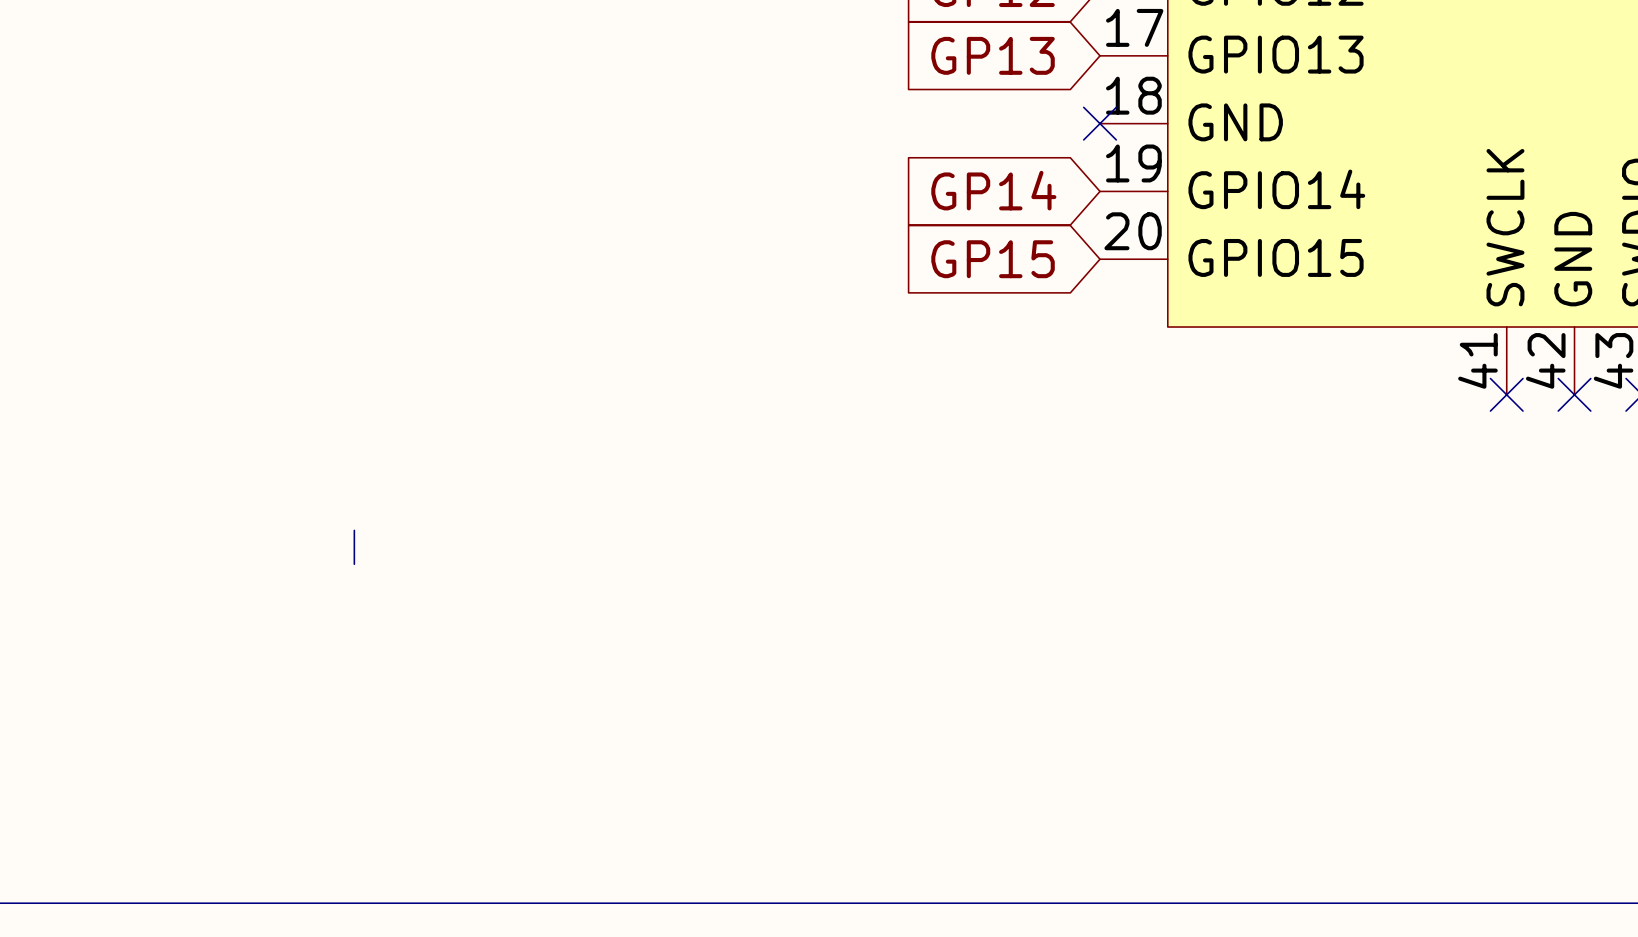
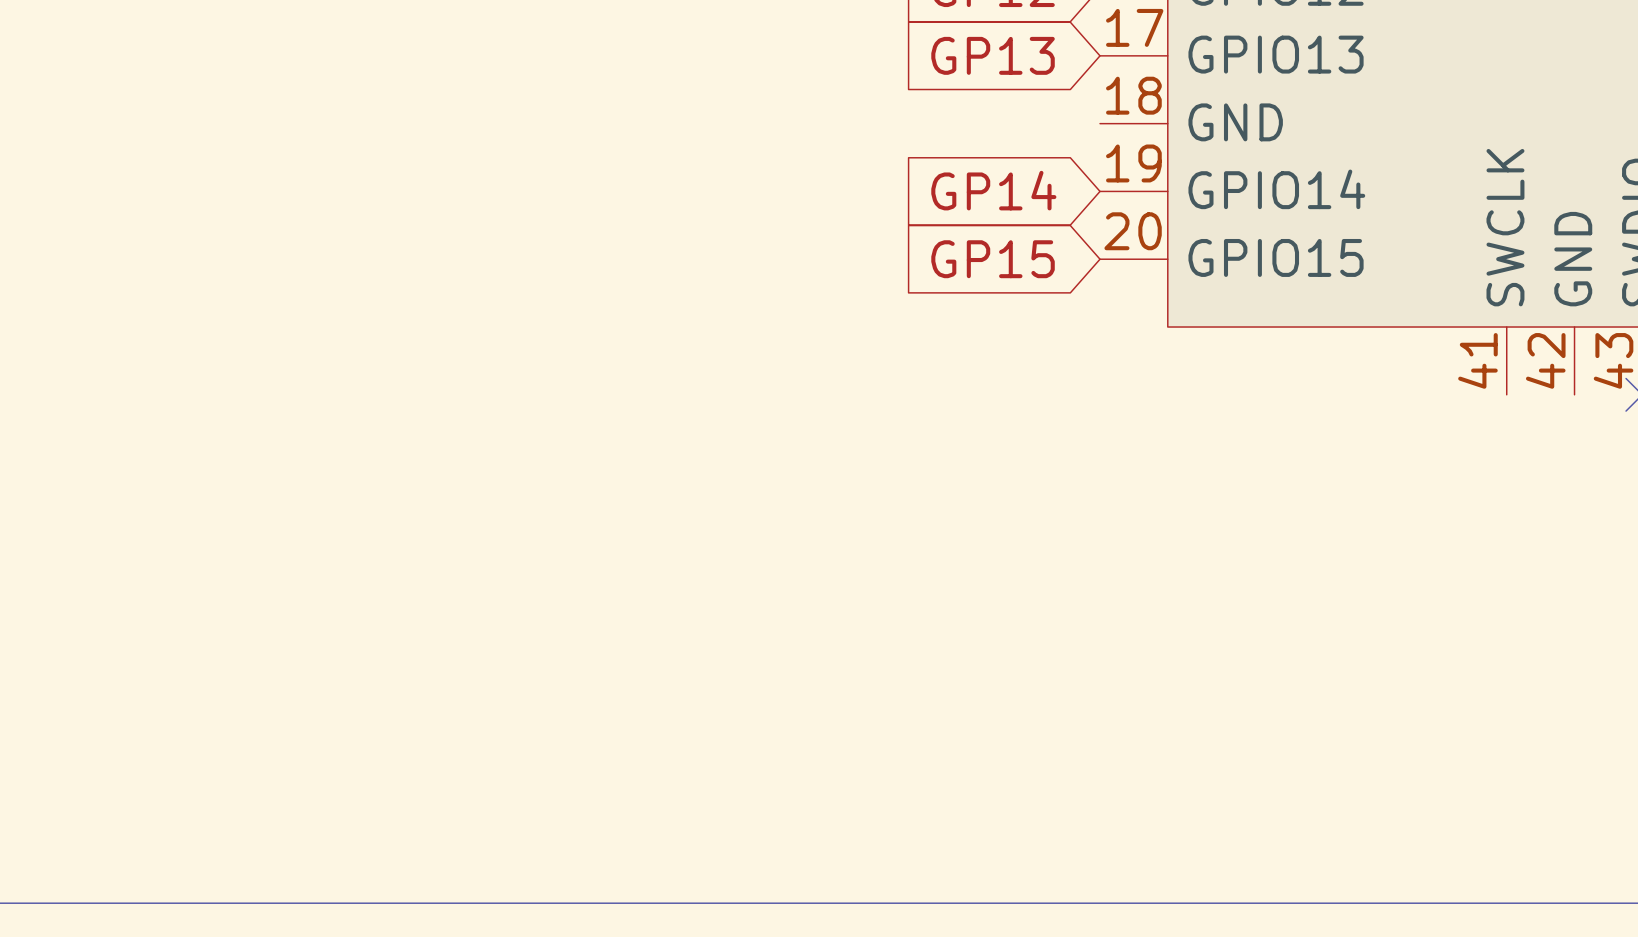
no-connect mark: (1100, 123) -> none
no-connect mark: (1506, 394) -> none
no-connect mark: (1574, 394) -> none
line: (354, 530) (354, 564) -> none

